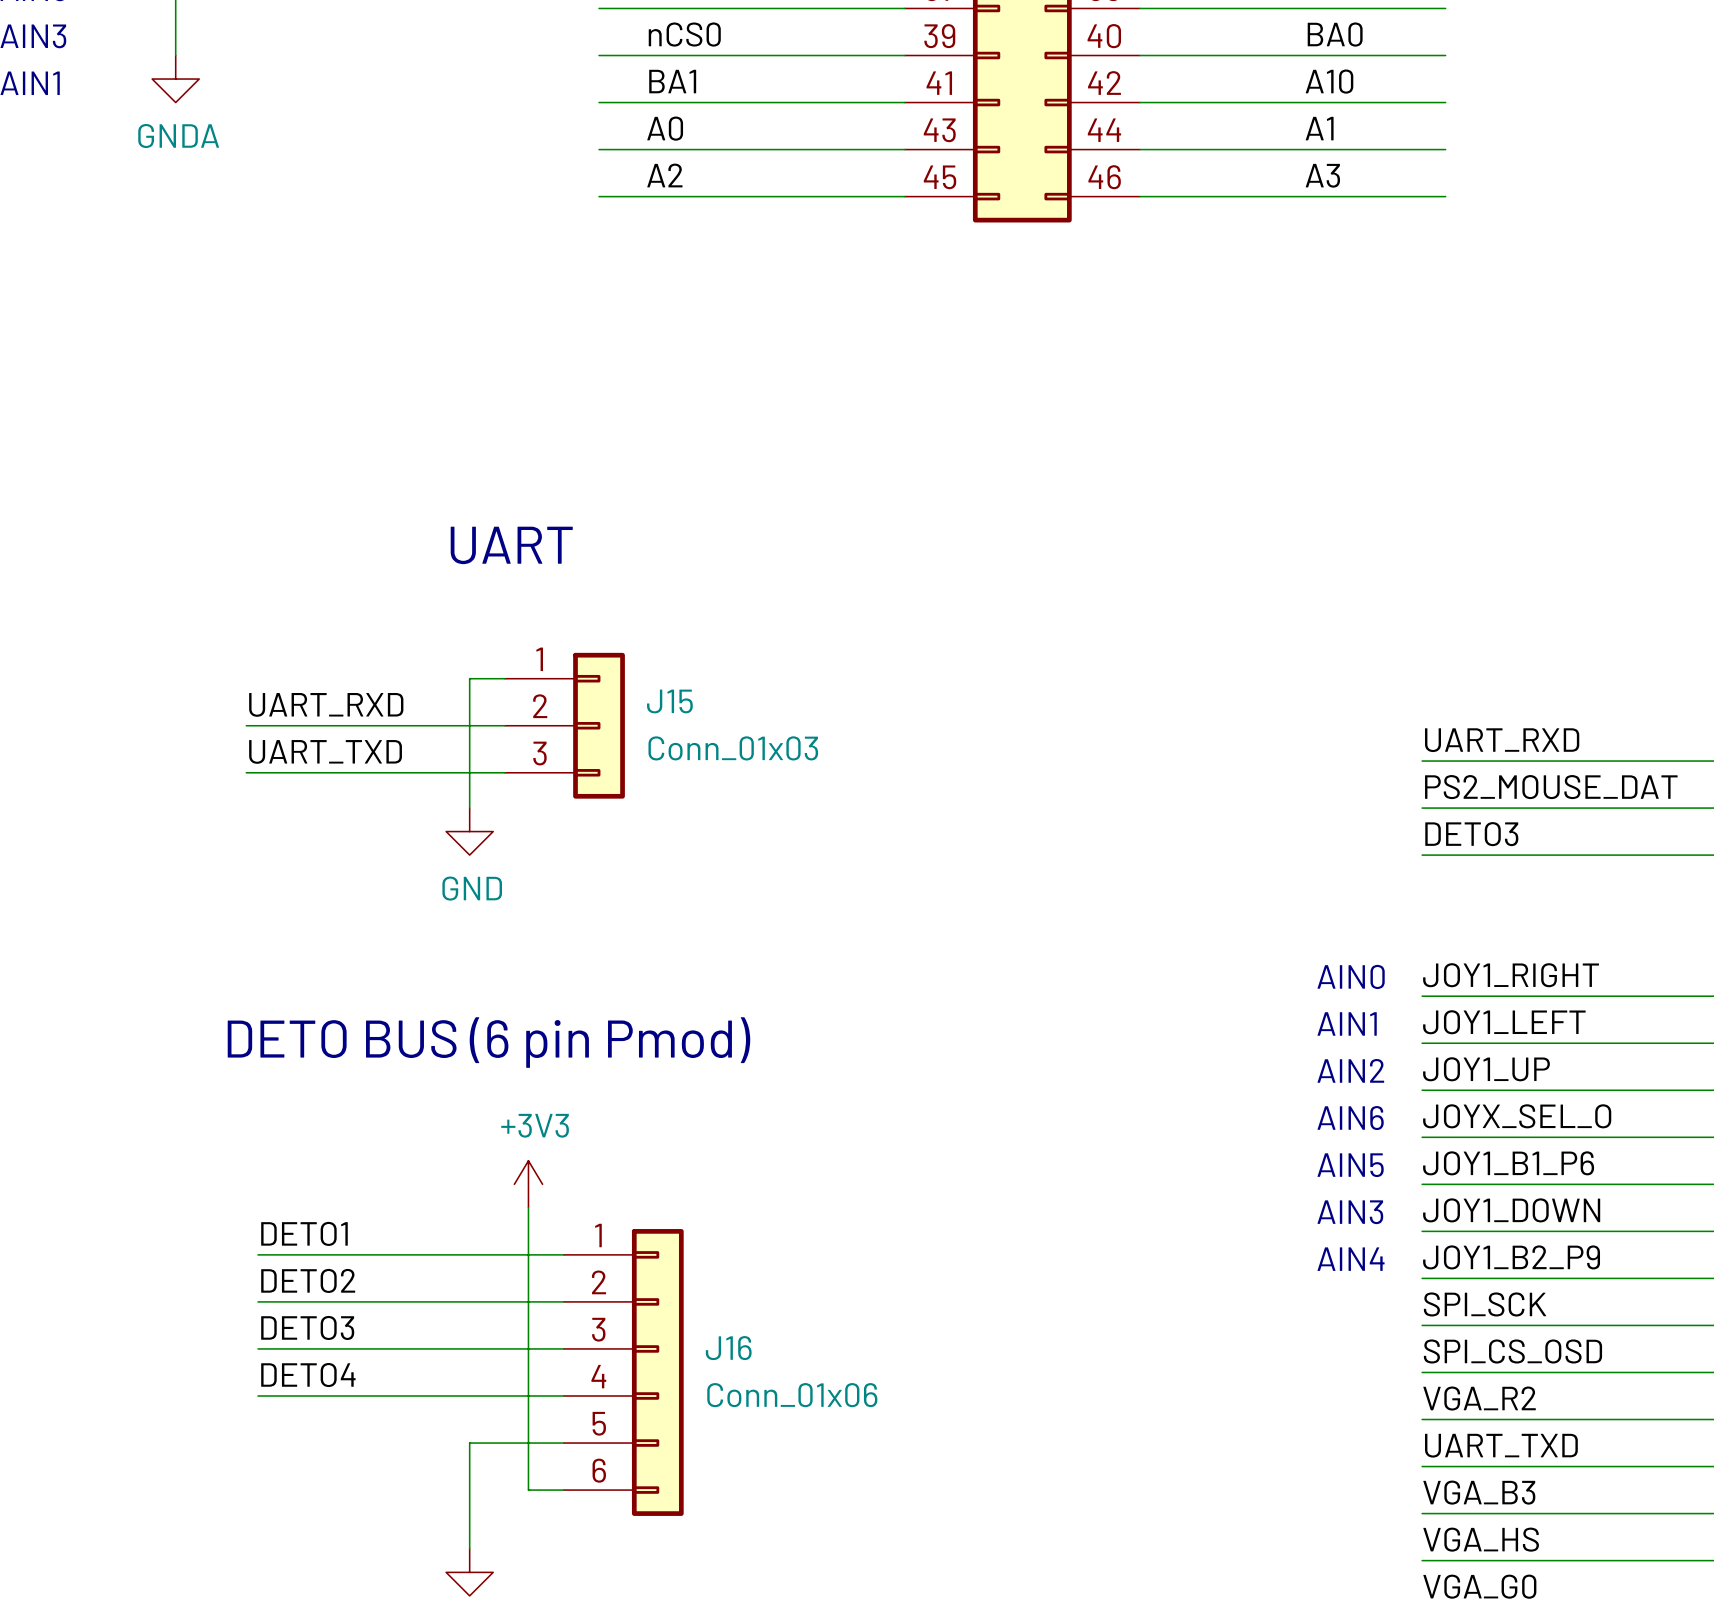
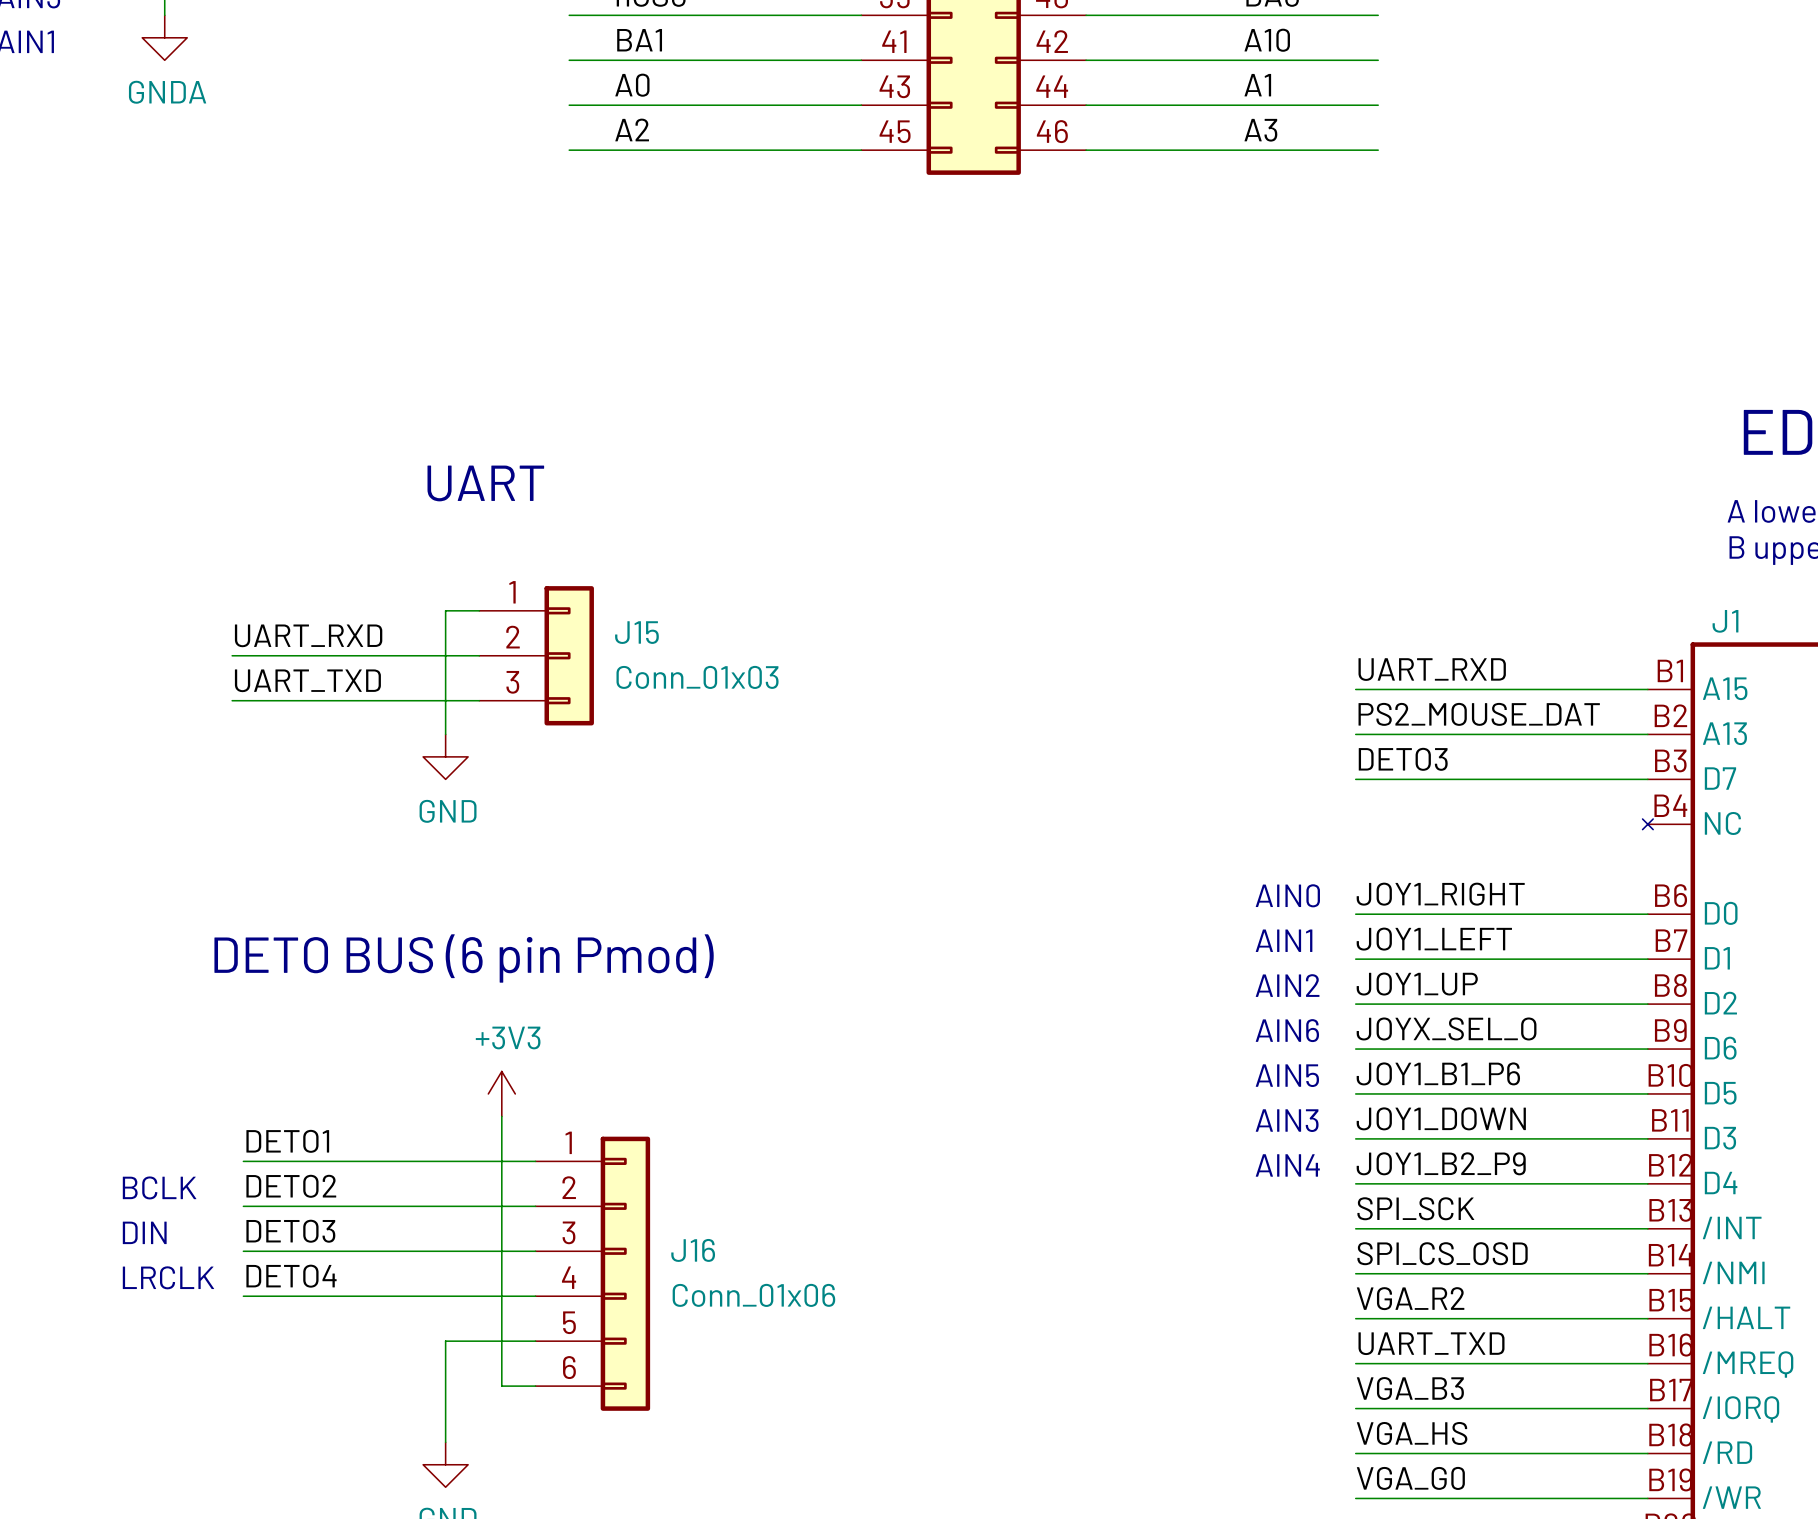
text: none -> BCLK (159, 1187)
text: none -> DIN (144, 1232)
text: none -> LRCLK (168, 1277)

